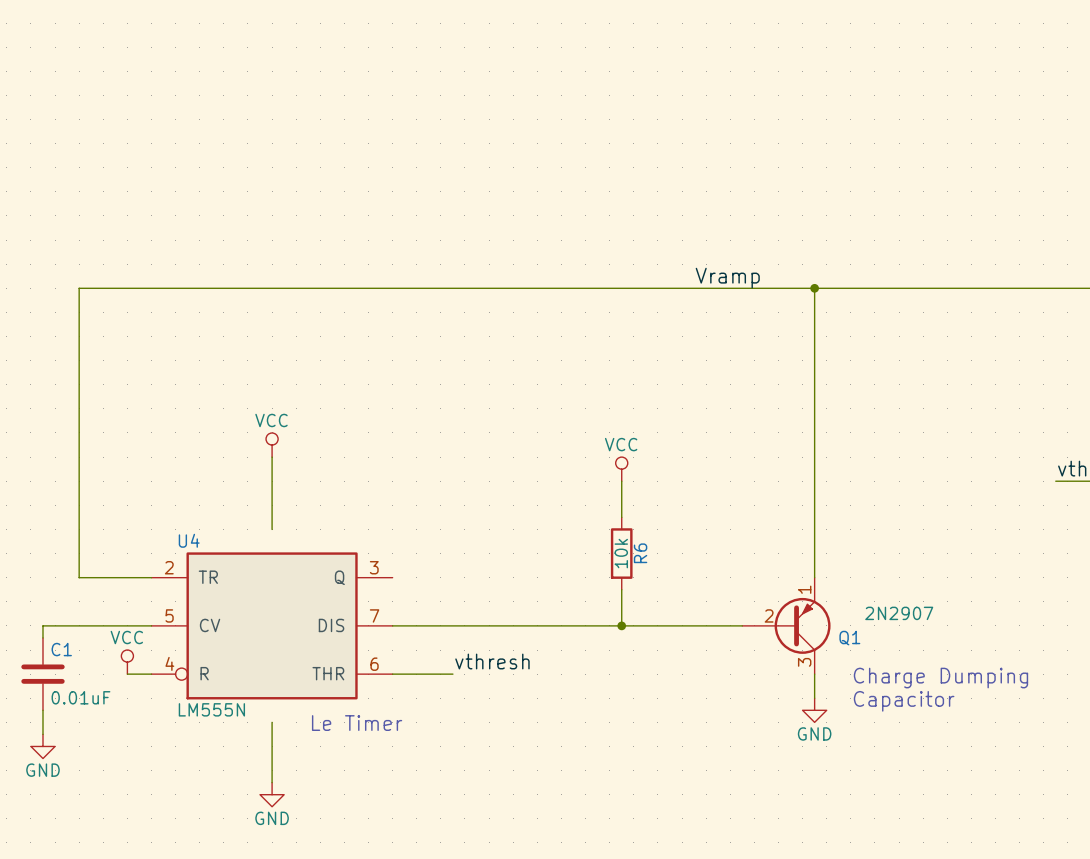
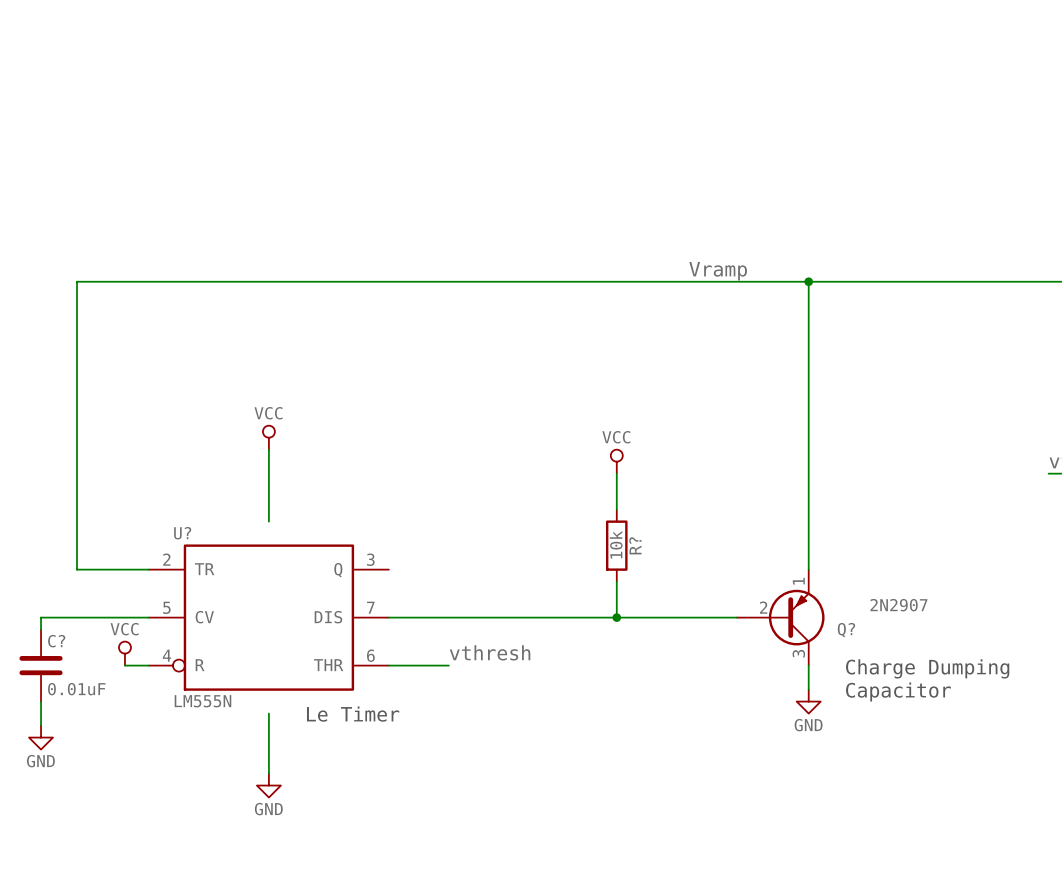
U4 name: U4 (189, 540) -> U? (182, 533)
R6 name: R6 (640, 553) -> R? (635, 545)
Q1 name: Q1 (849, 638) -> Q? (846, 630)
C1 name: C1 (61, 649) -> C? (56, 641)

